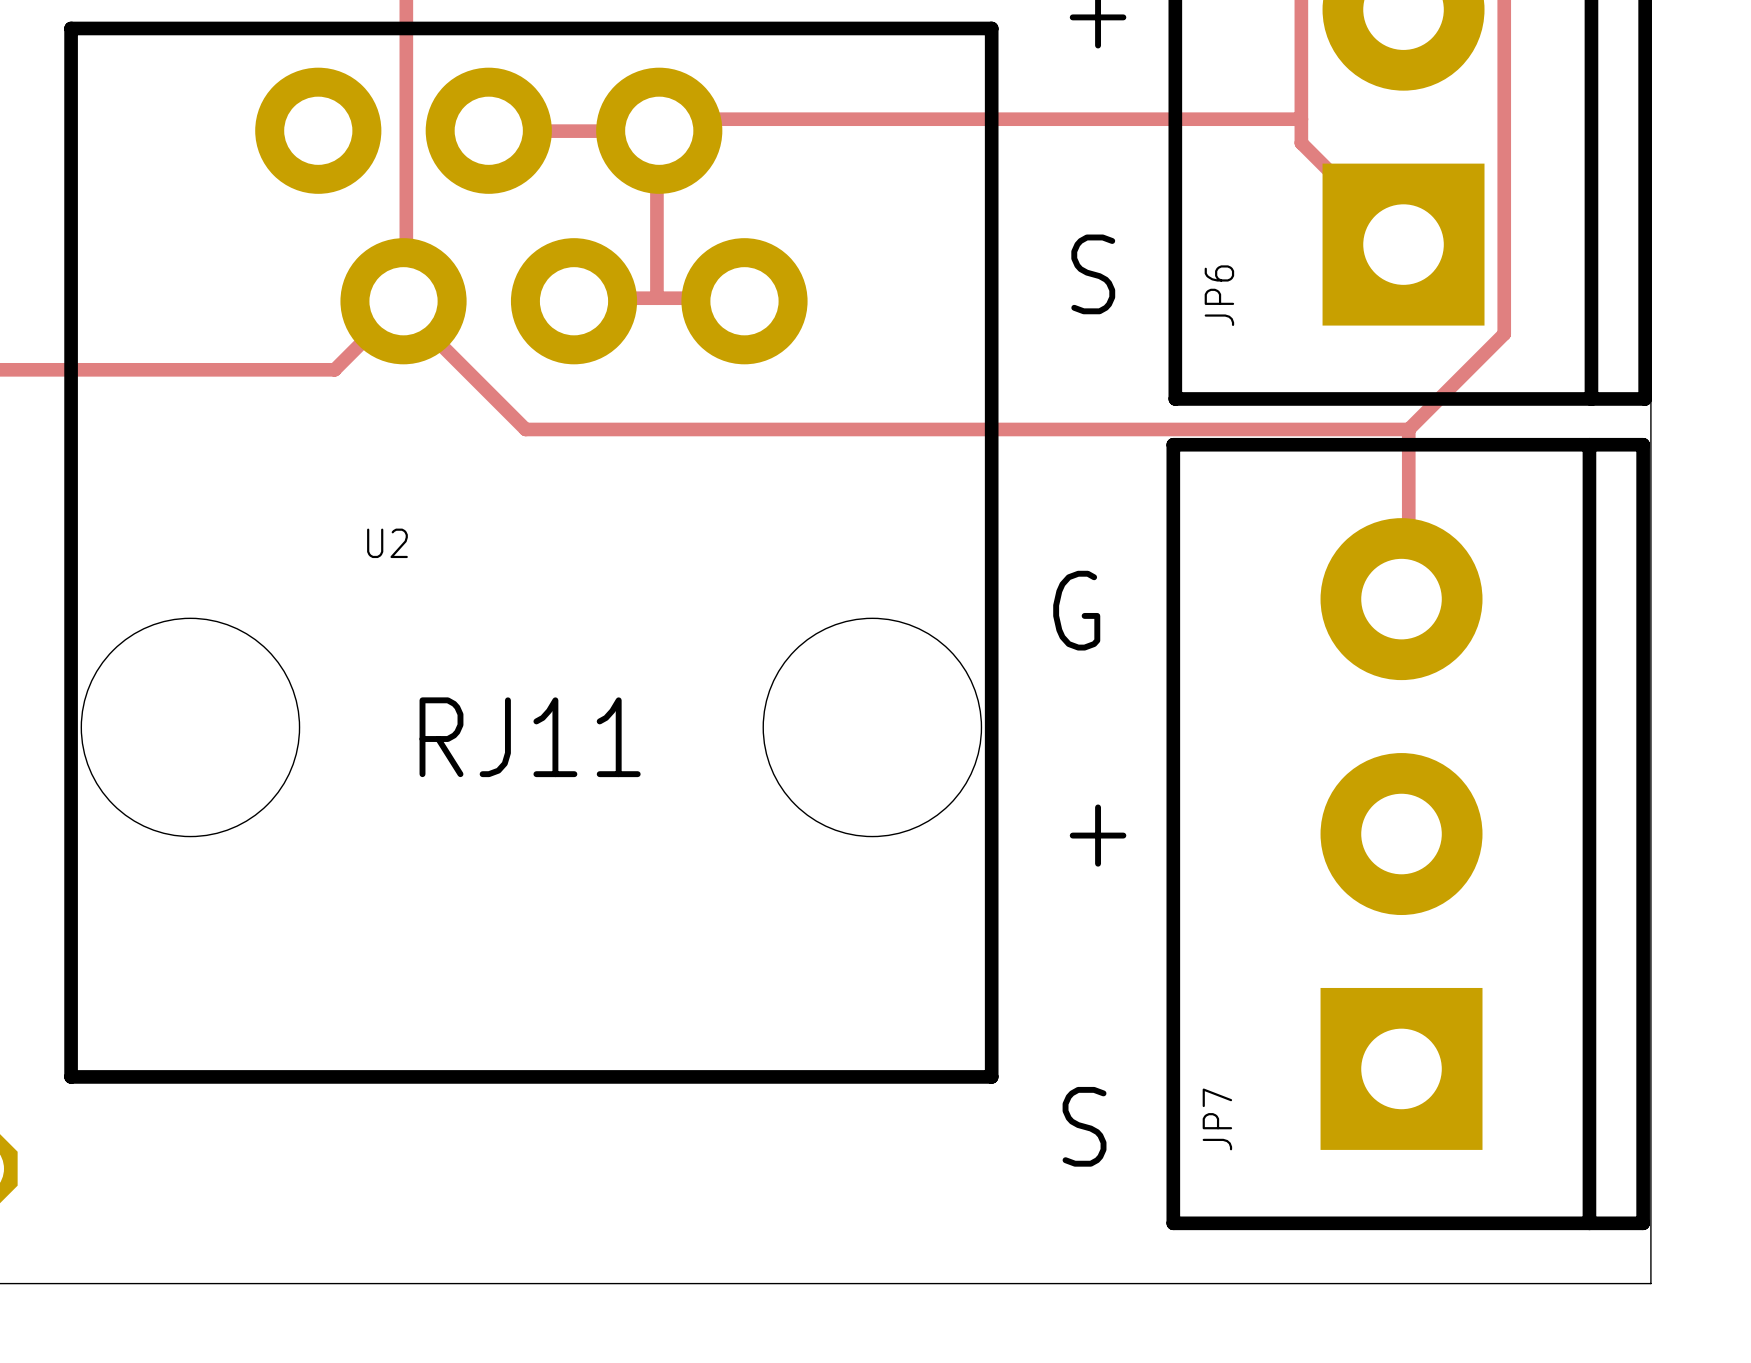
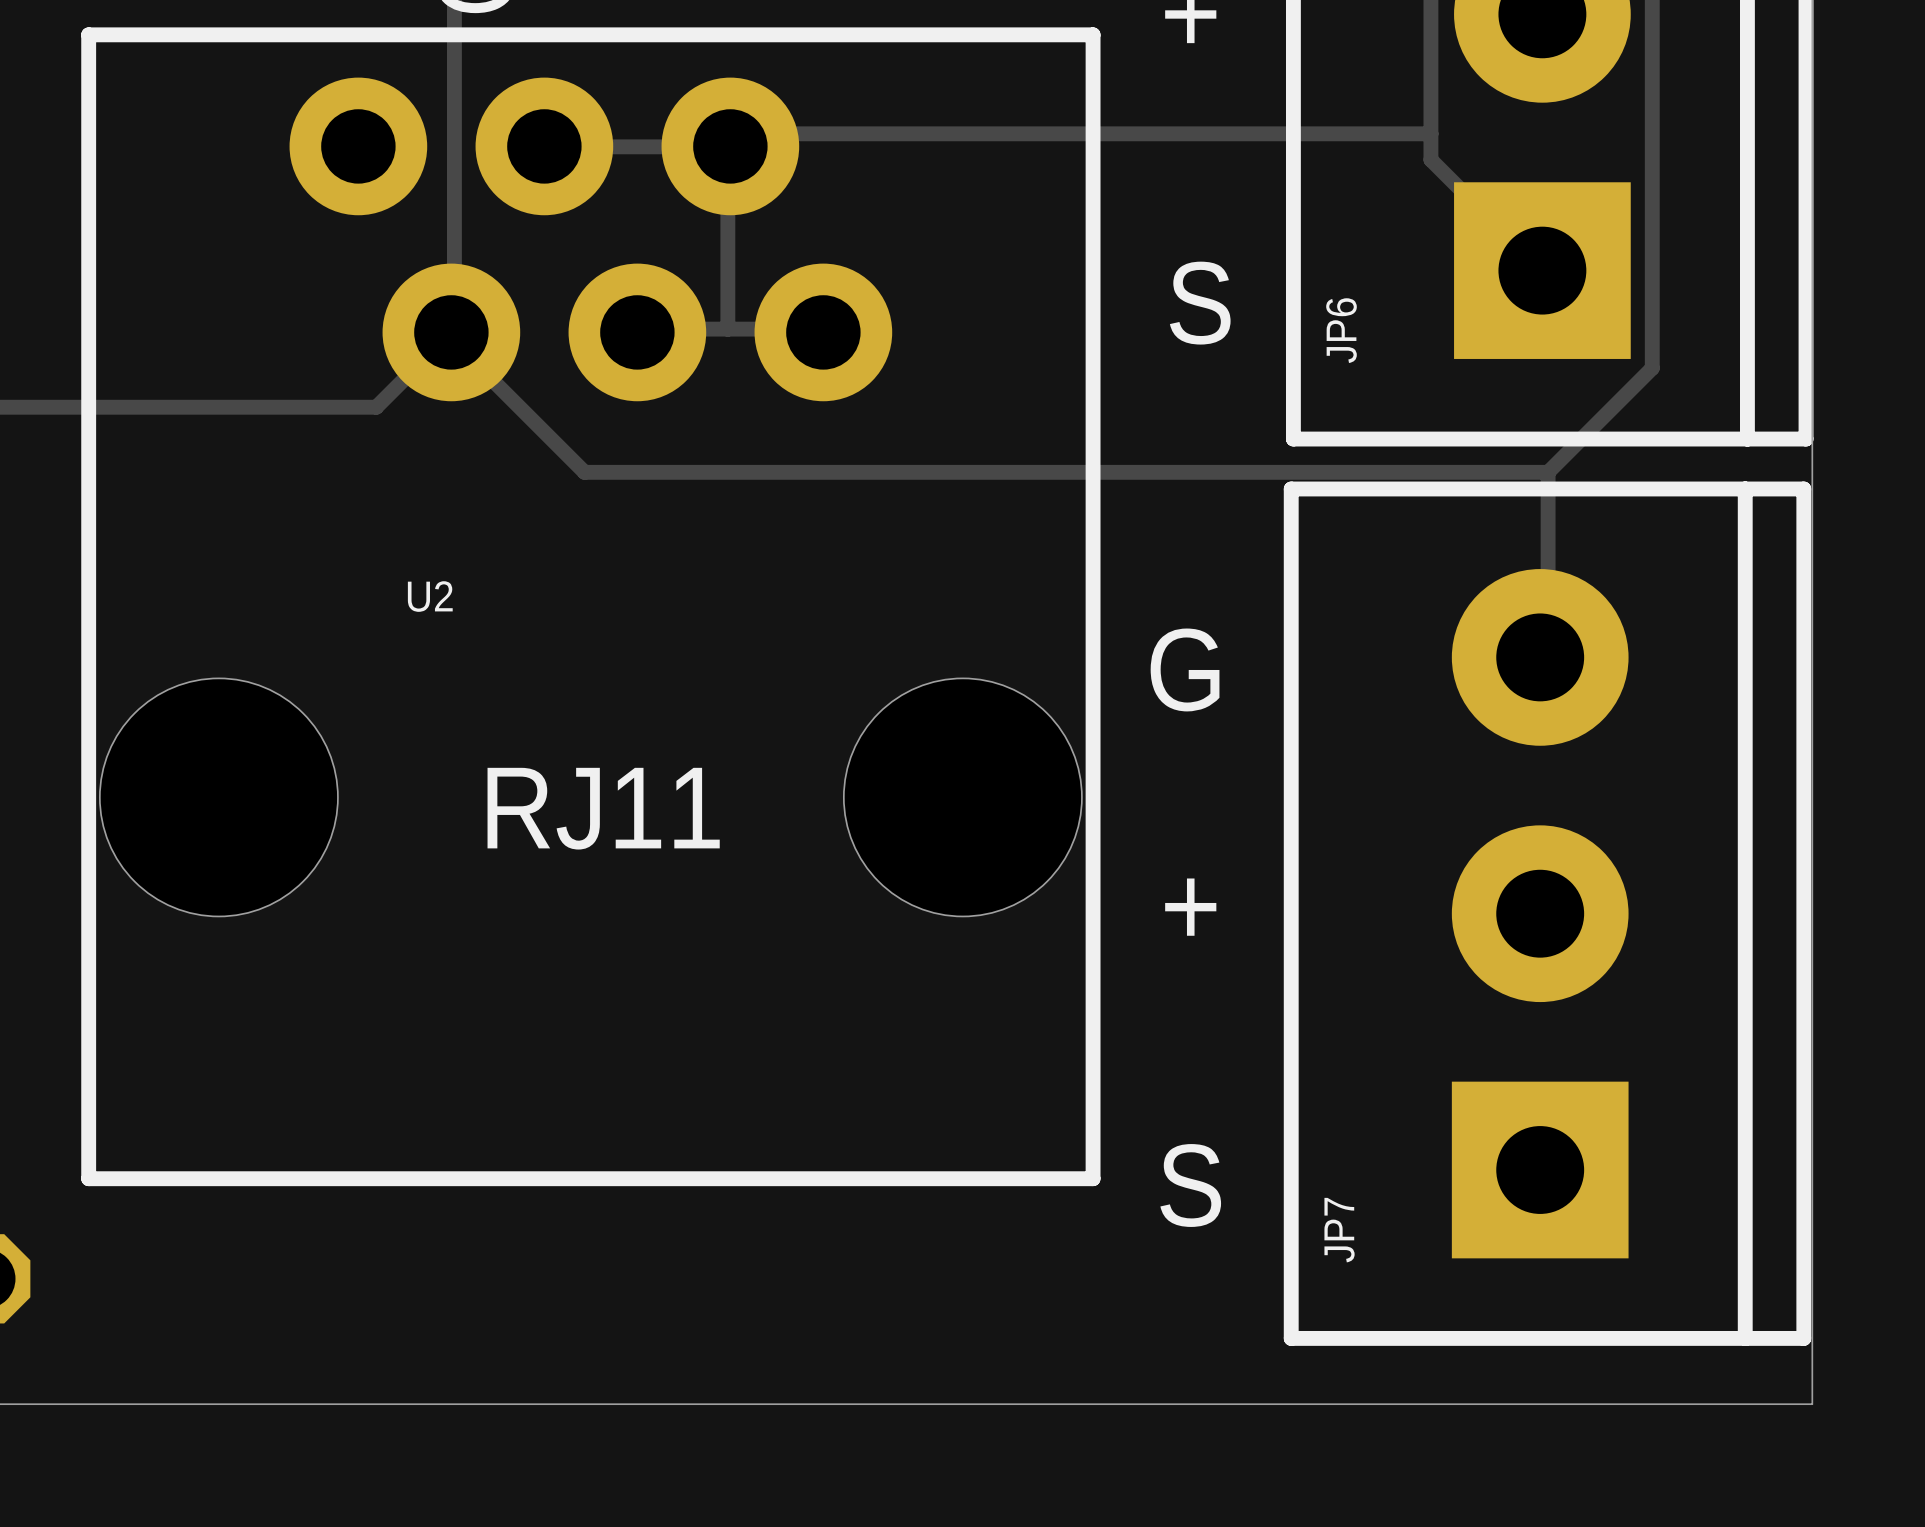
text position: S (1084, 1126) -> S (1190, 1185)

